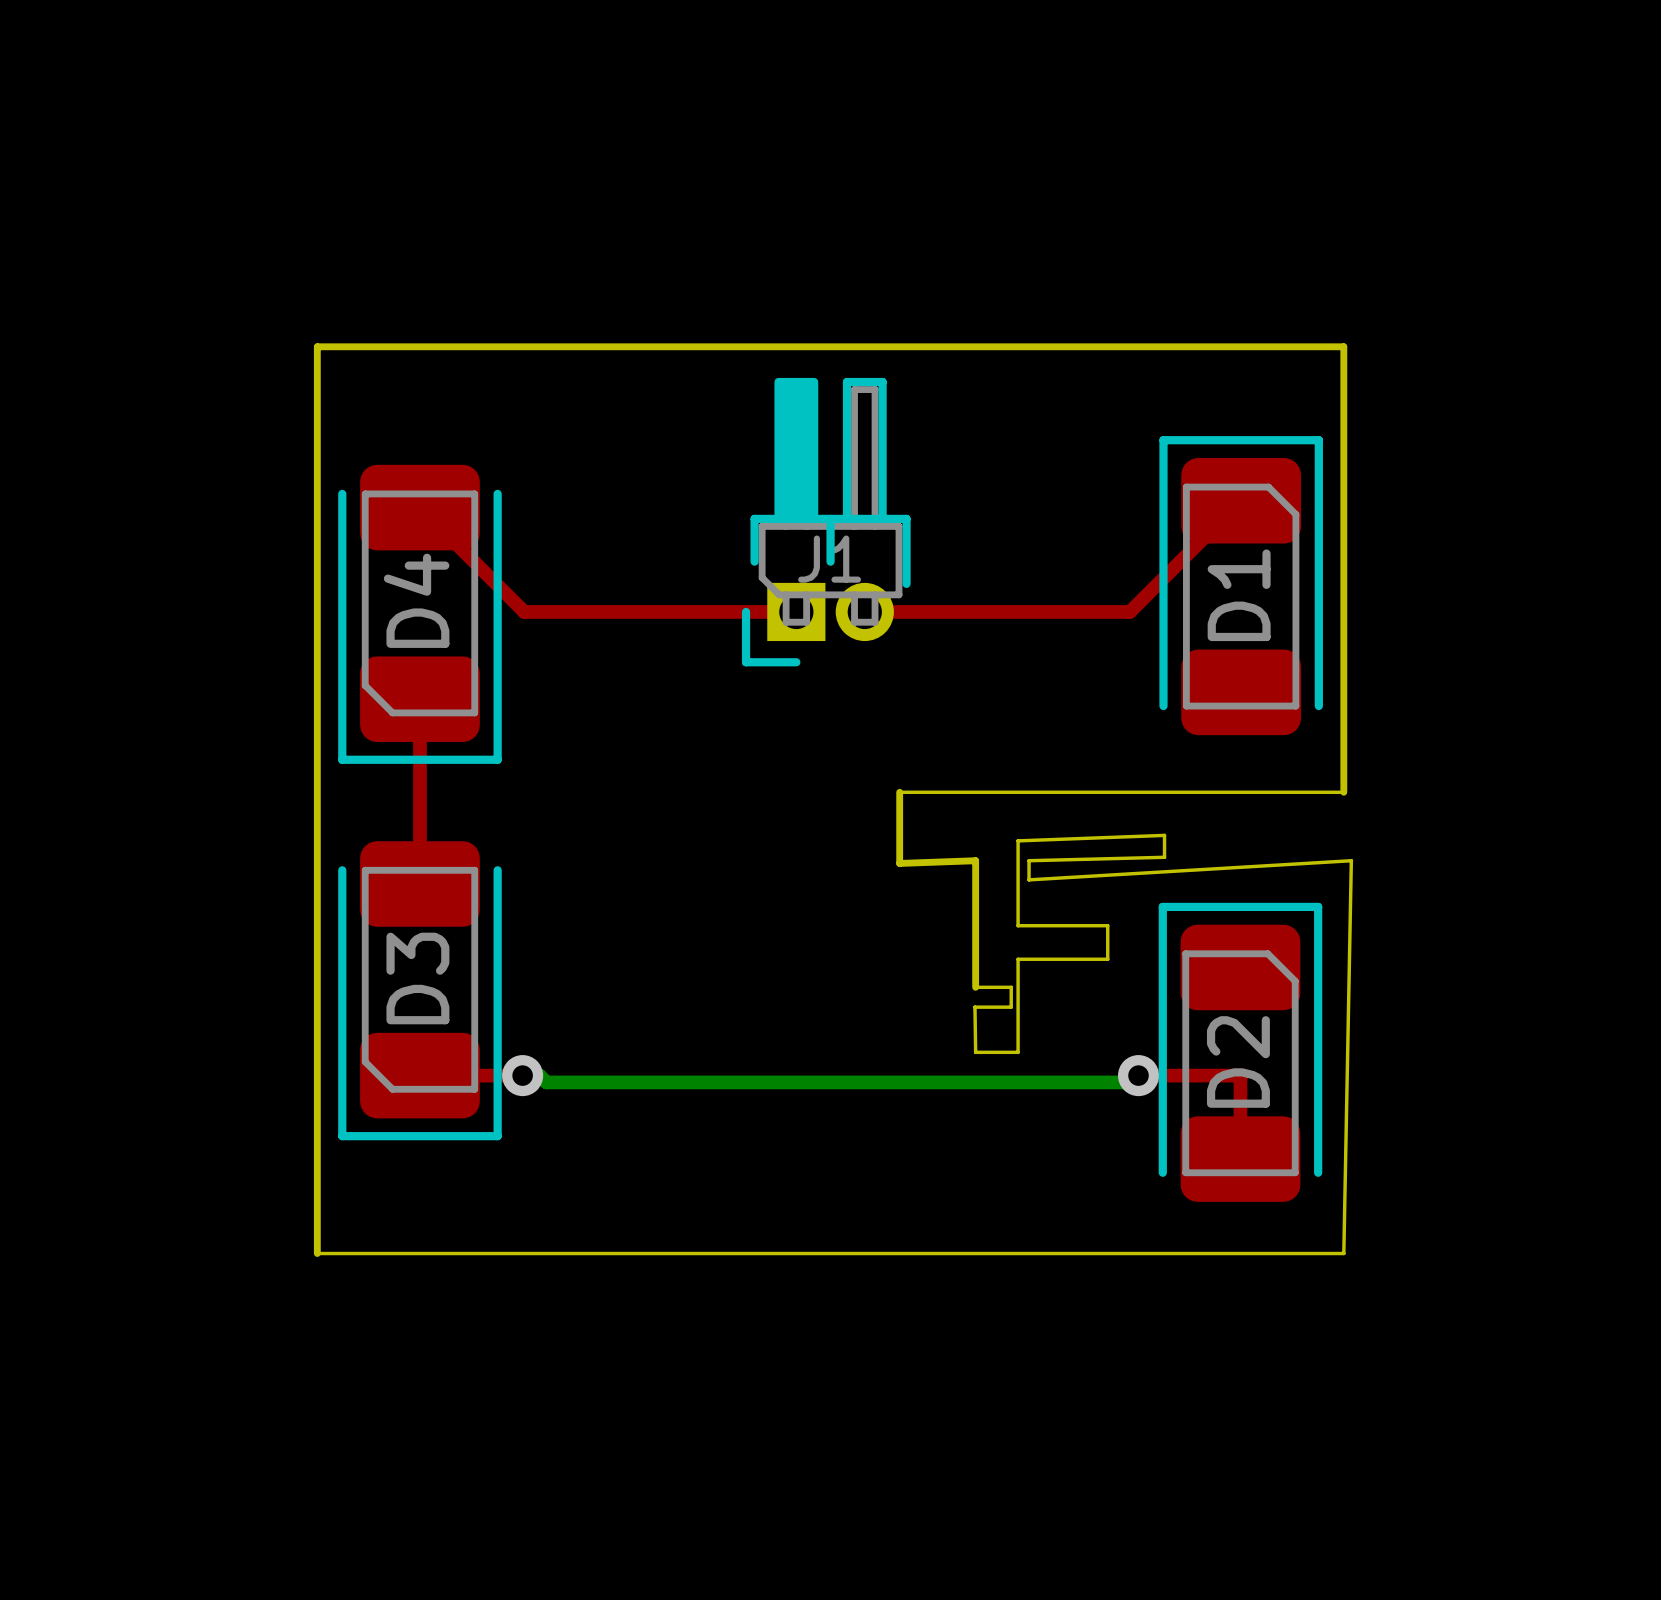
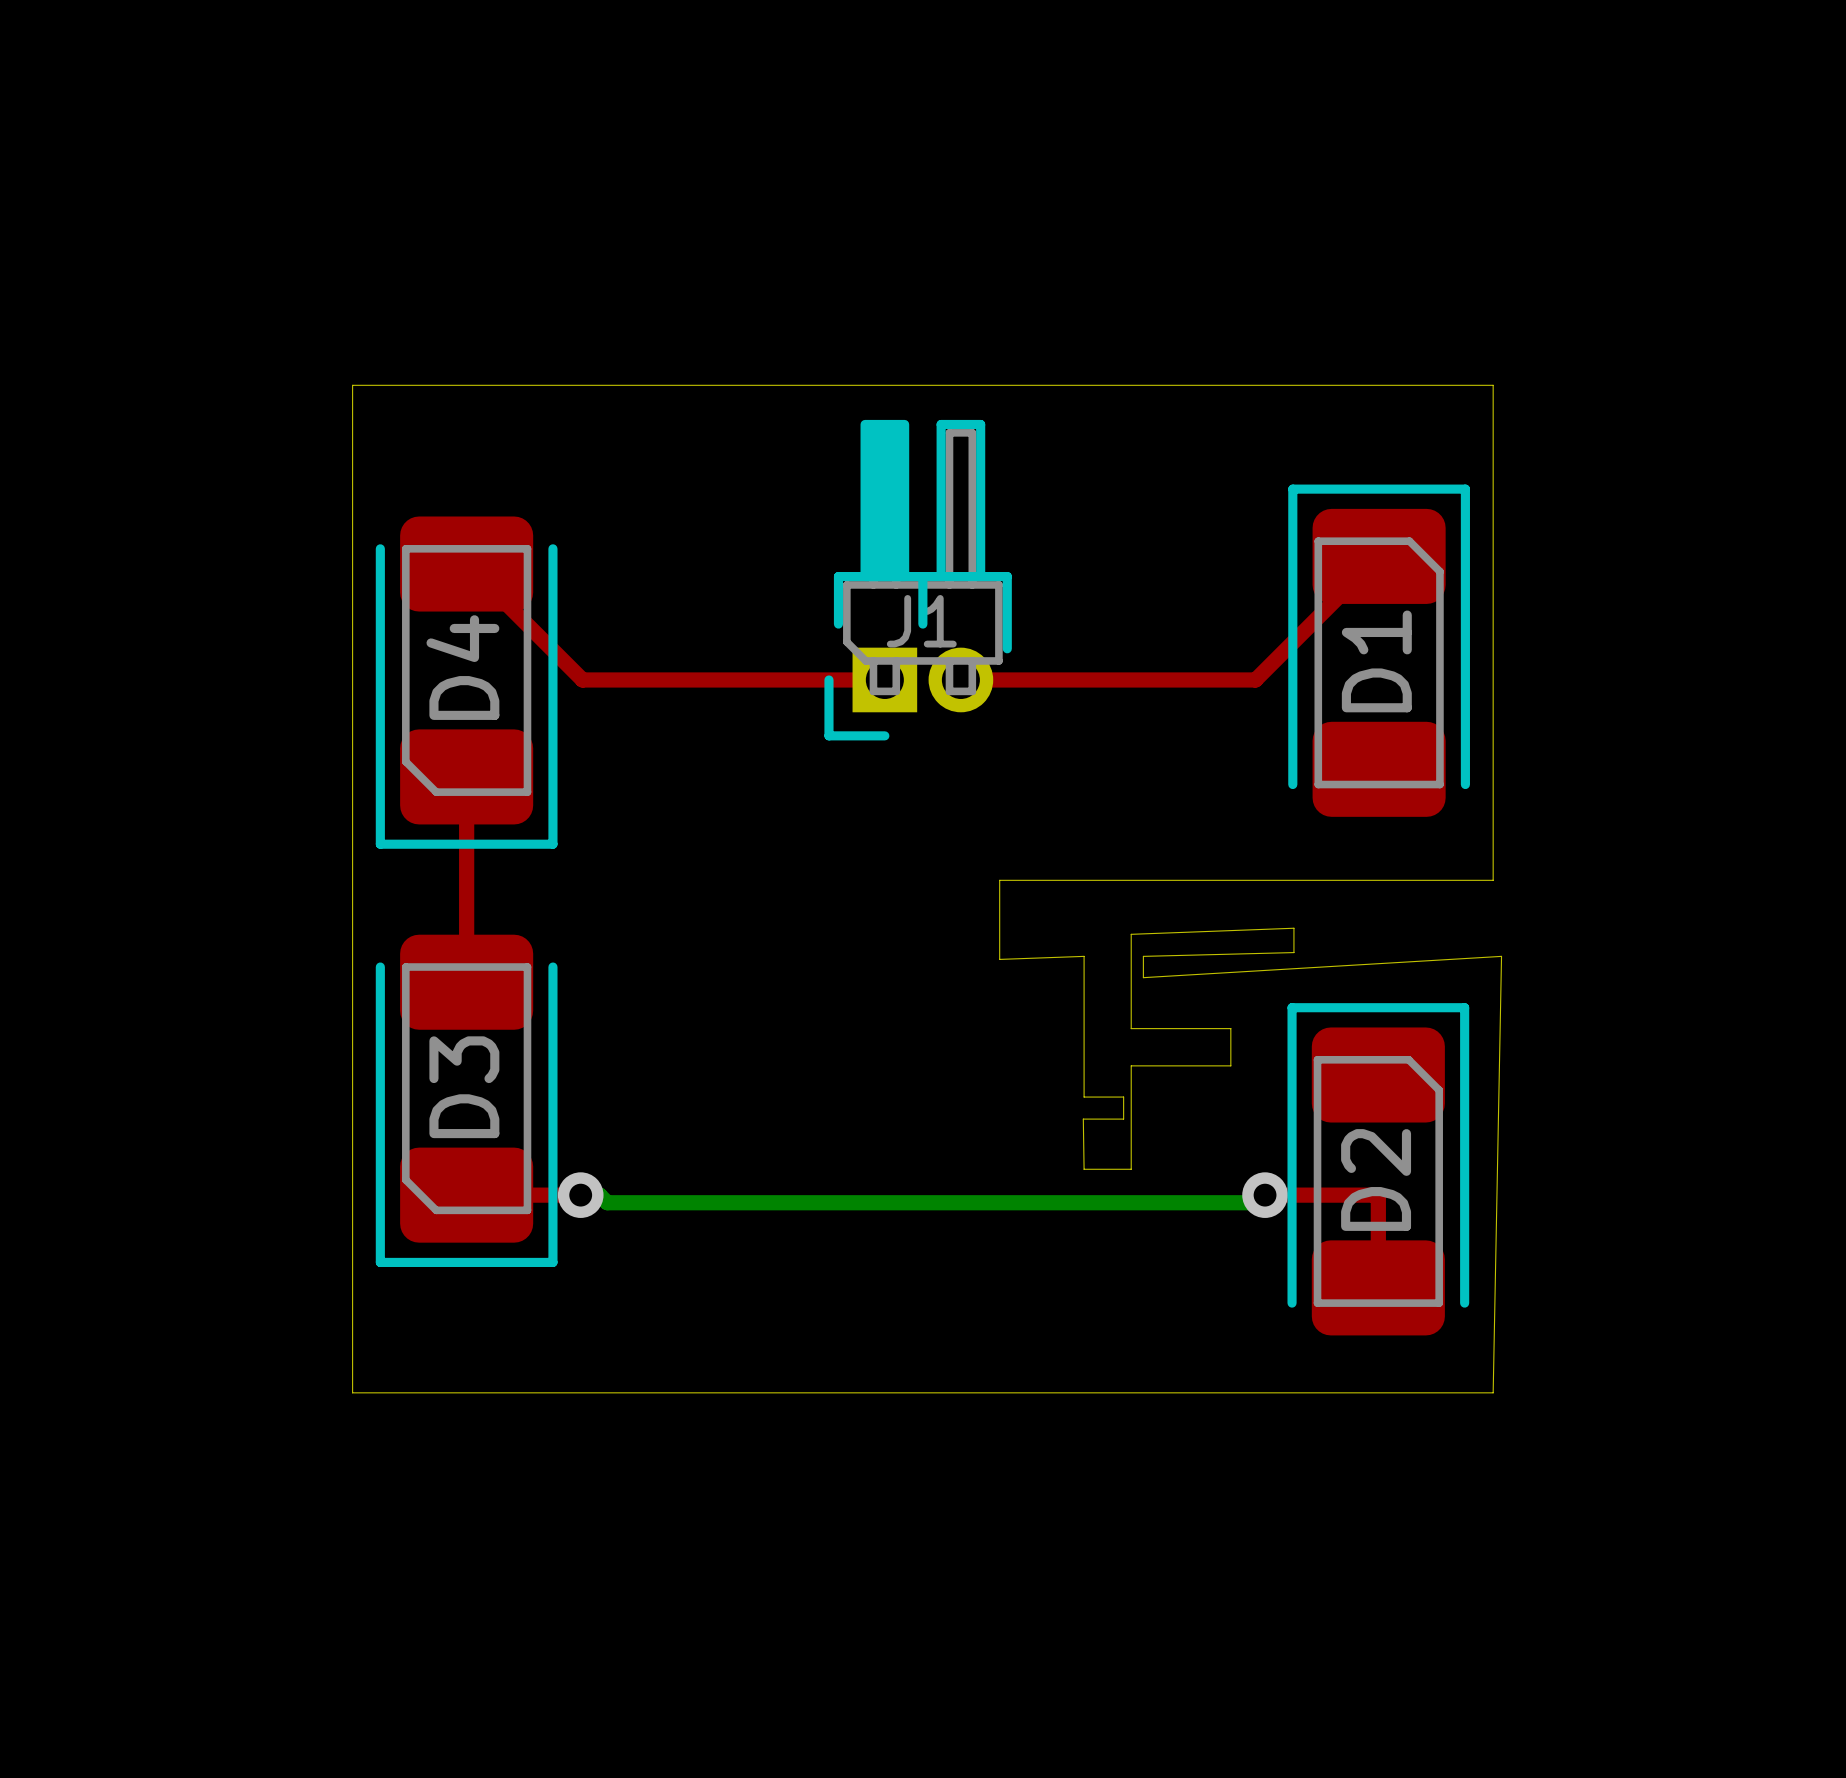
board edge width: thick (317, 346) (1343, 346) (1343, 792) (899, 792) (899, 863) (975, 860) (975, 987) (1011, 987) (1011, 1007) (974, 1007) (975, 1052) (1018, 1052) (1018, 959) (1107, 959) (1107, 925) (1018, 925) (1018, 840) (1164, 835) (1164, 857) (1029, 860) (1029, 879) (1351, 860) (1343, 1253) (317, 1253) (317, 346) -> thin (352, 385) (1493, 385) (1493, 880) (999, 880) (999, 959) (1084, 956) (1084, 1097) (1123, 1097) (1123, 1119) (1083, 1119) (1084, 1169) (1131, 1169) (1131, 1065) (1230, 1065) (1230, 1028) (1131, 1028) (1131, 934) (1293, 928) (1293, 952) (1143, 956) (1143, 977) (1501, 956) (1493, 1392) (352, 1392) (352, 385)

